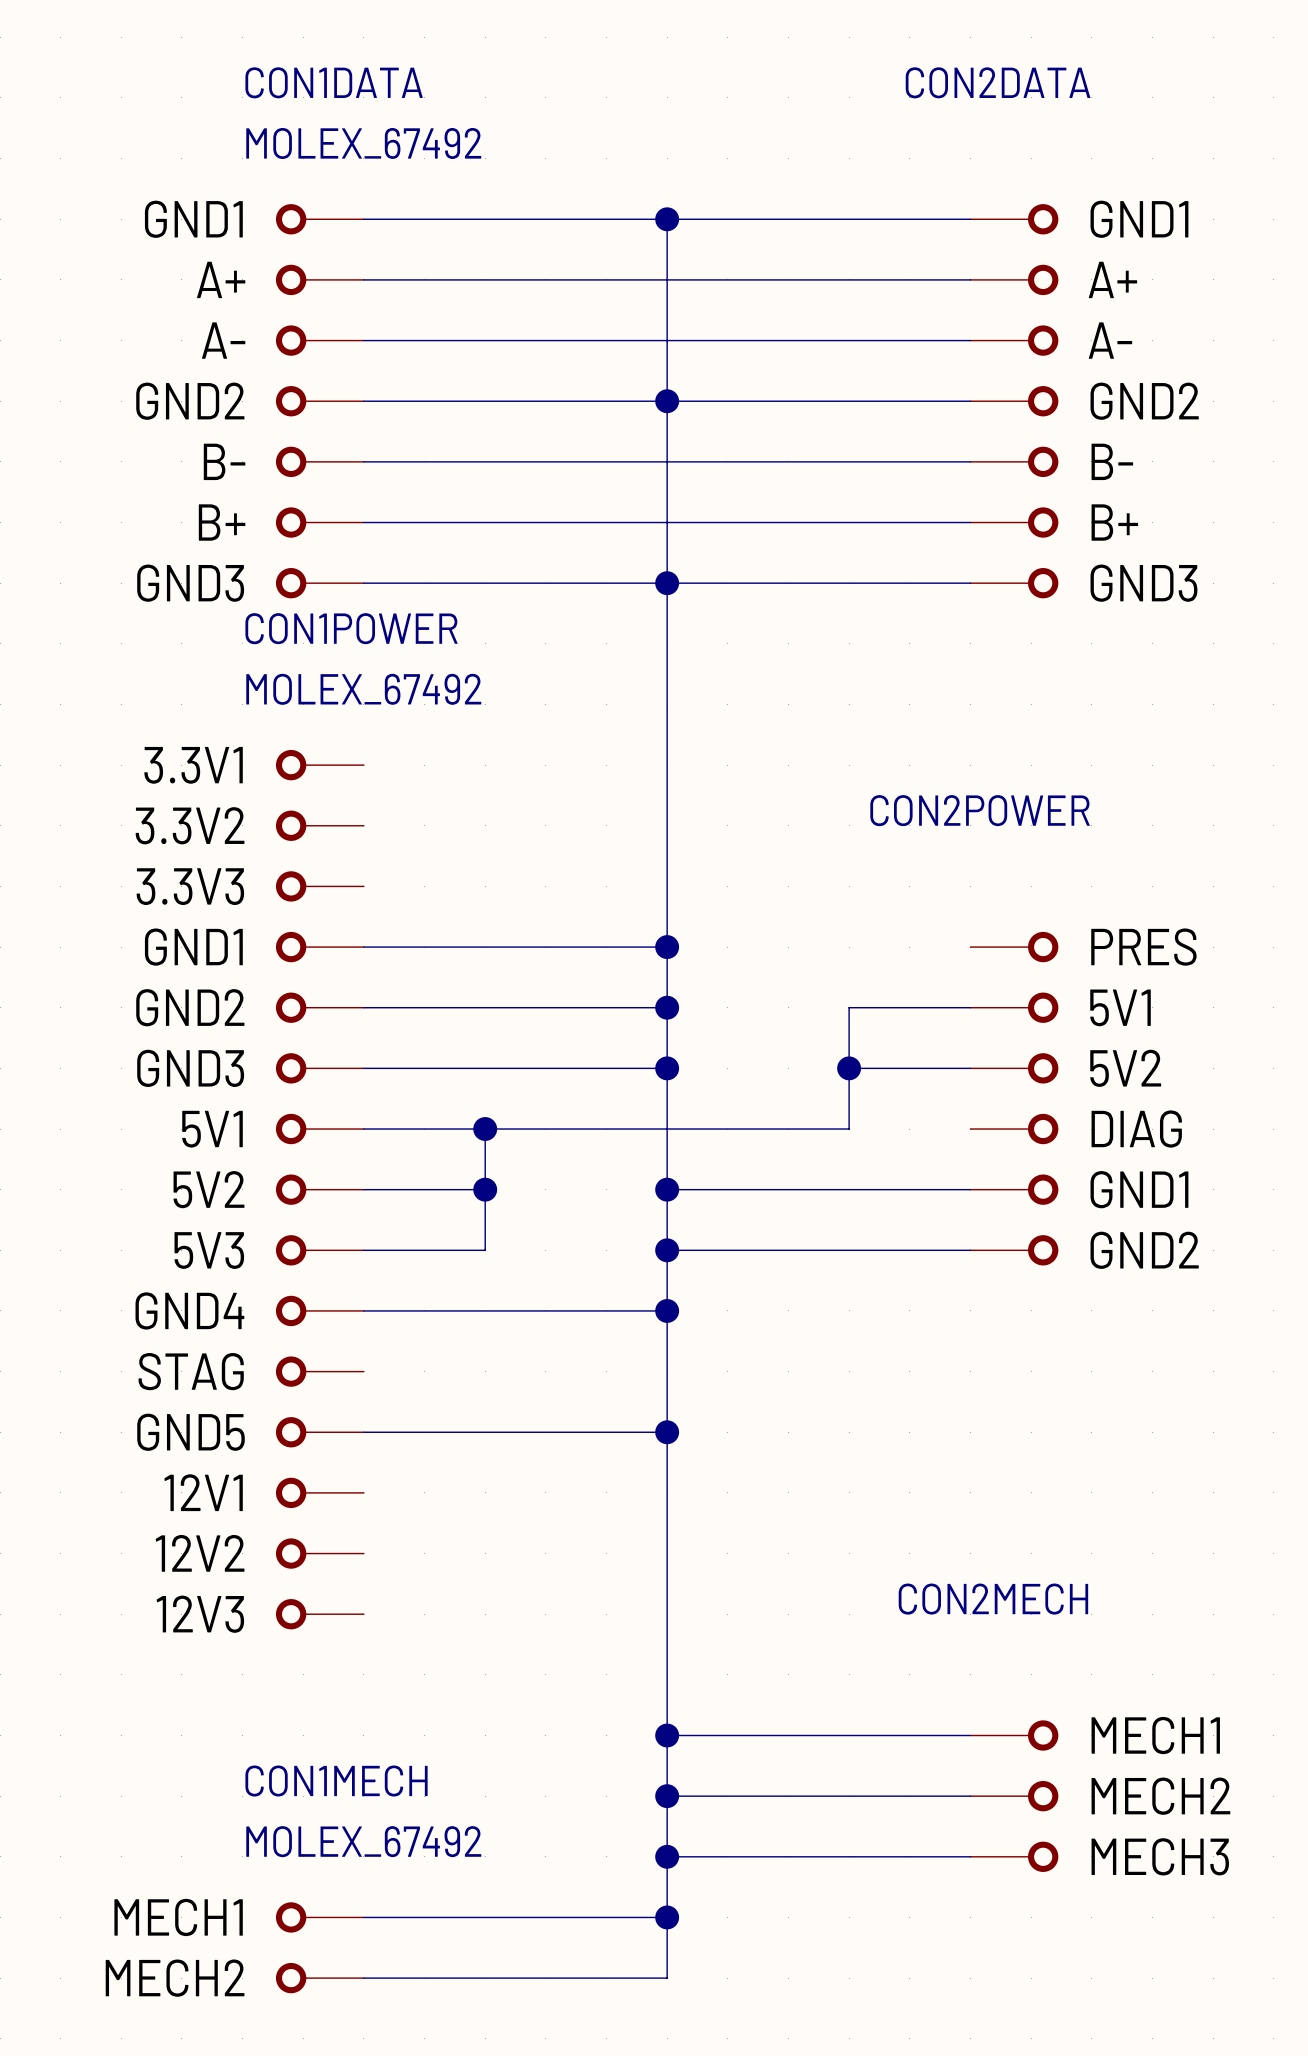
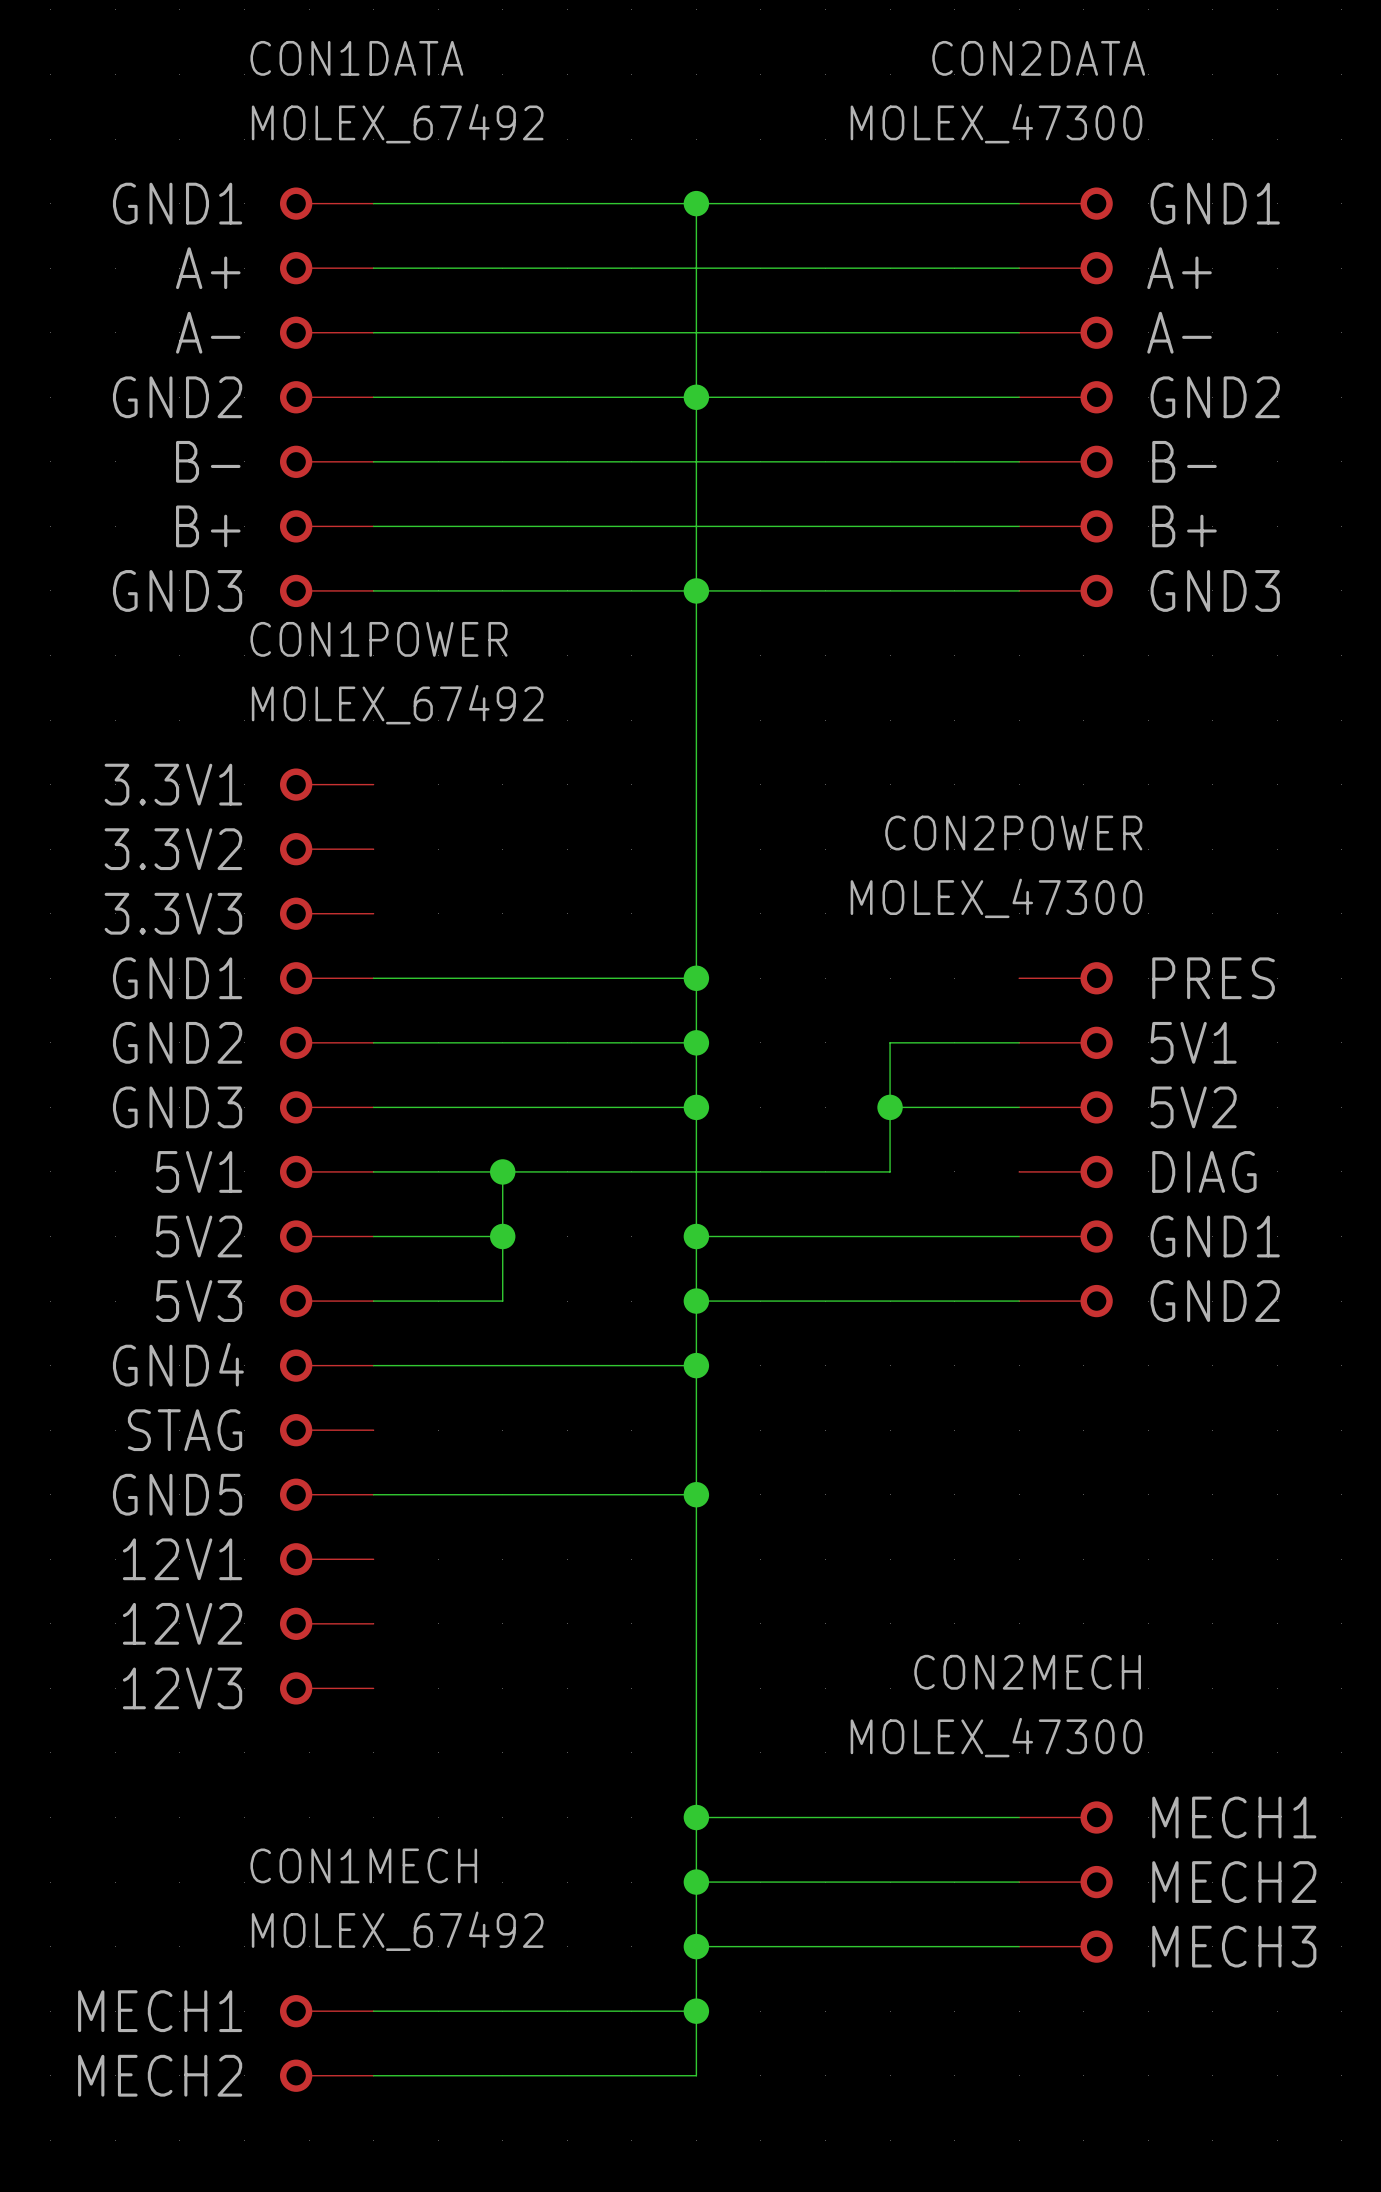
CON2DATA value: none -> MOLEX_47300 (996, 123)
CON2POWER value: none -> MOLEX_47300 (996, 898)
CON2MECH value: none -> MOLEX_47300 (996, 1737)

